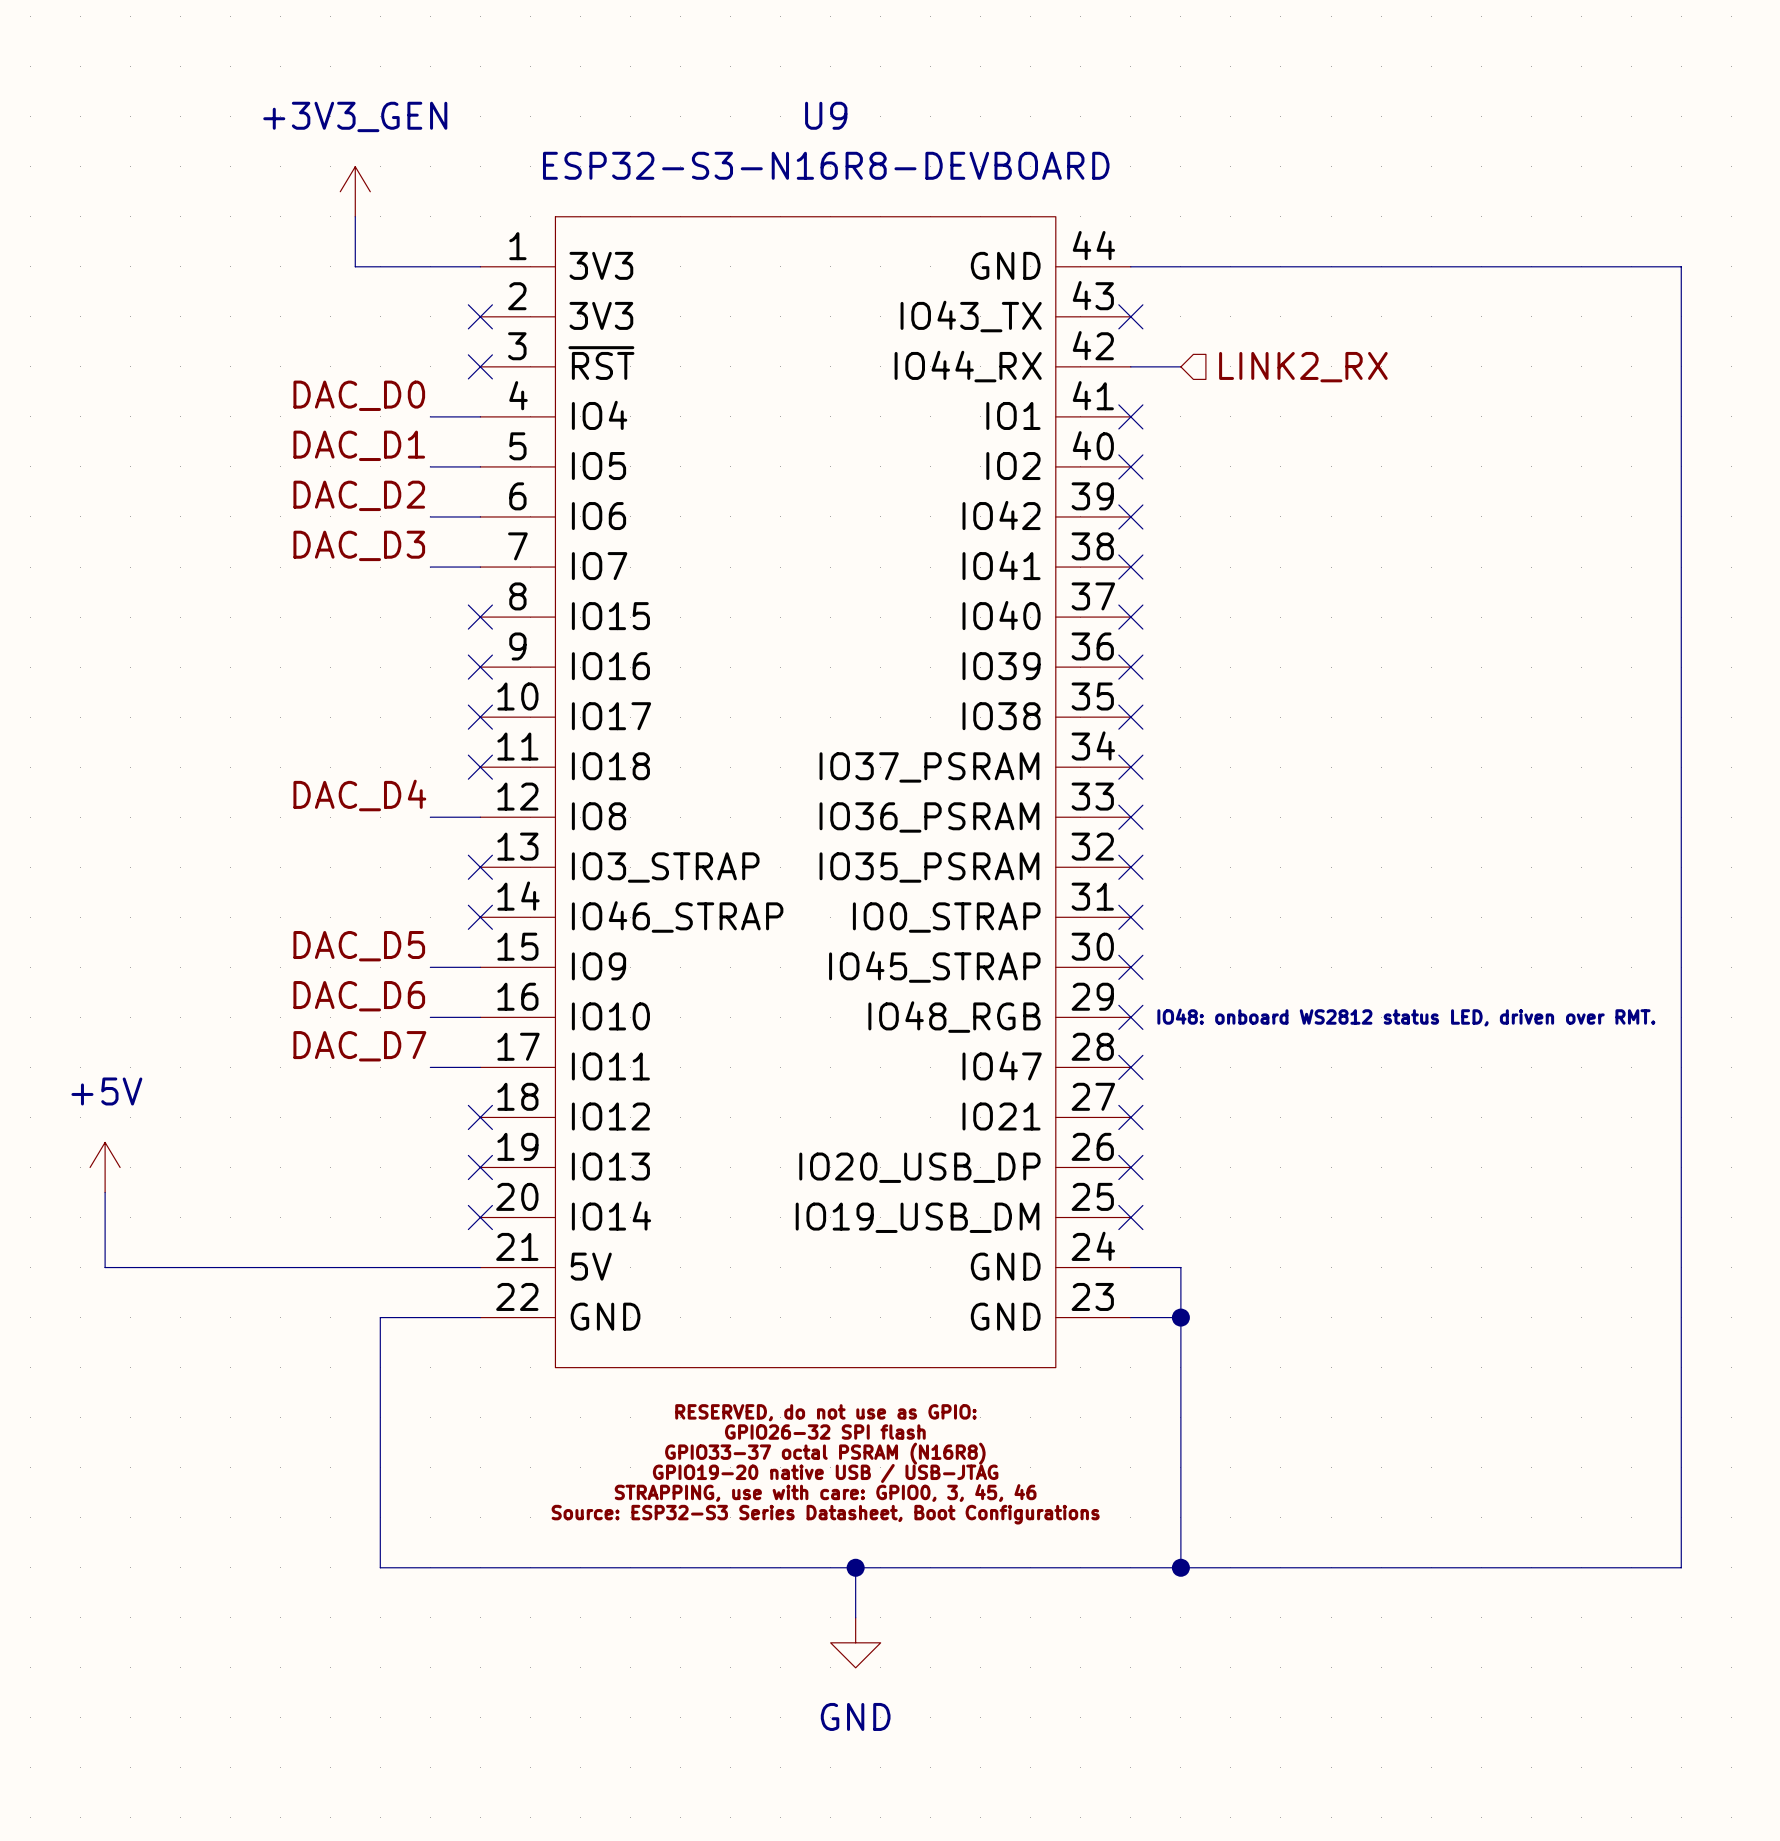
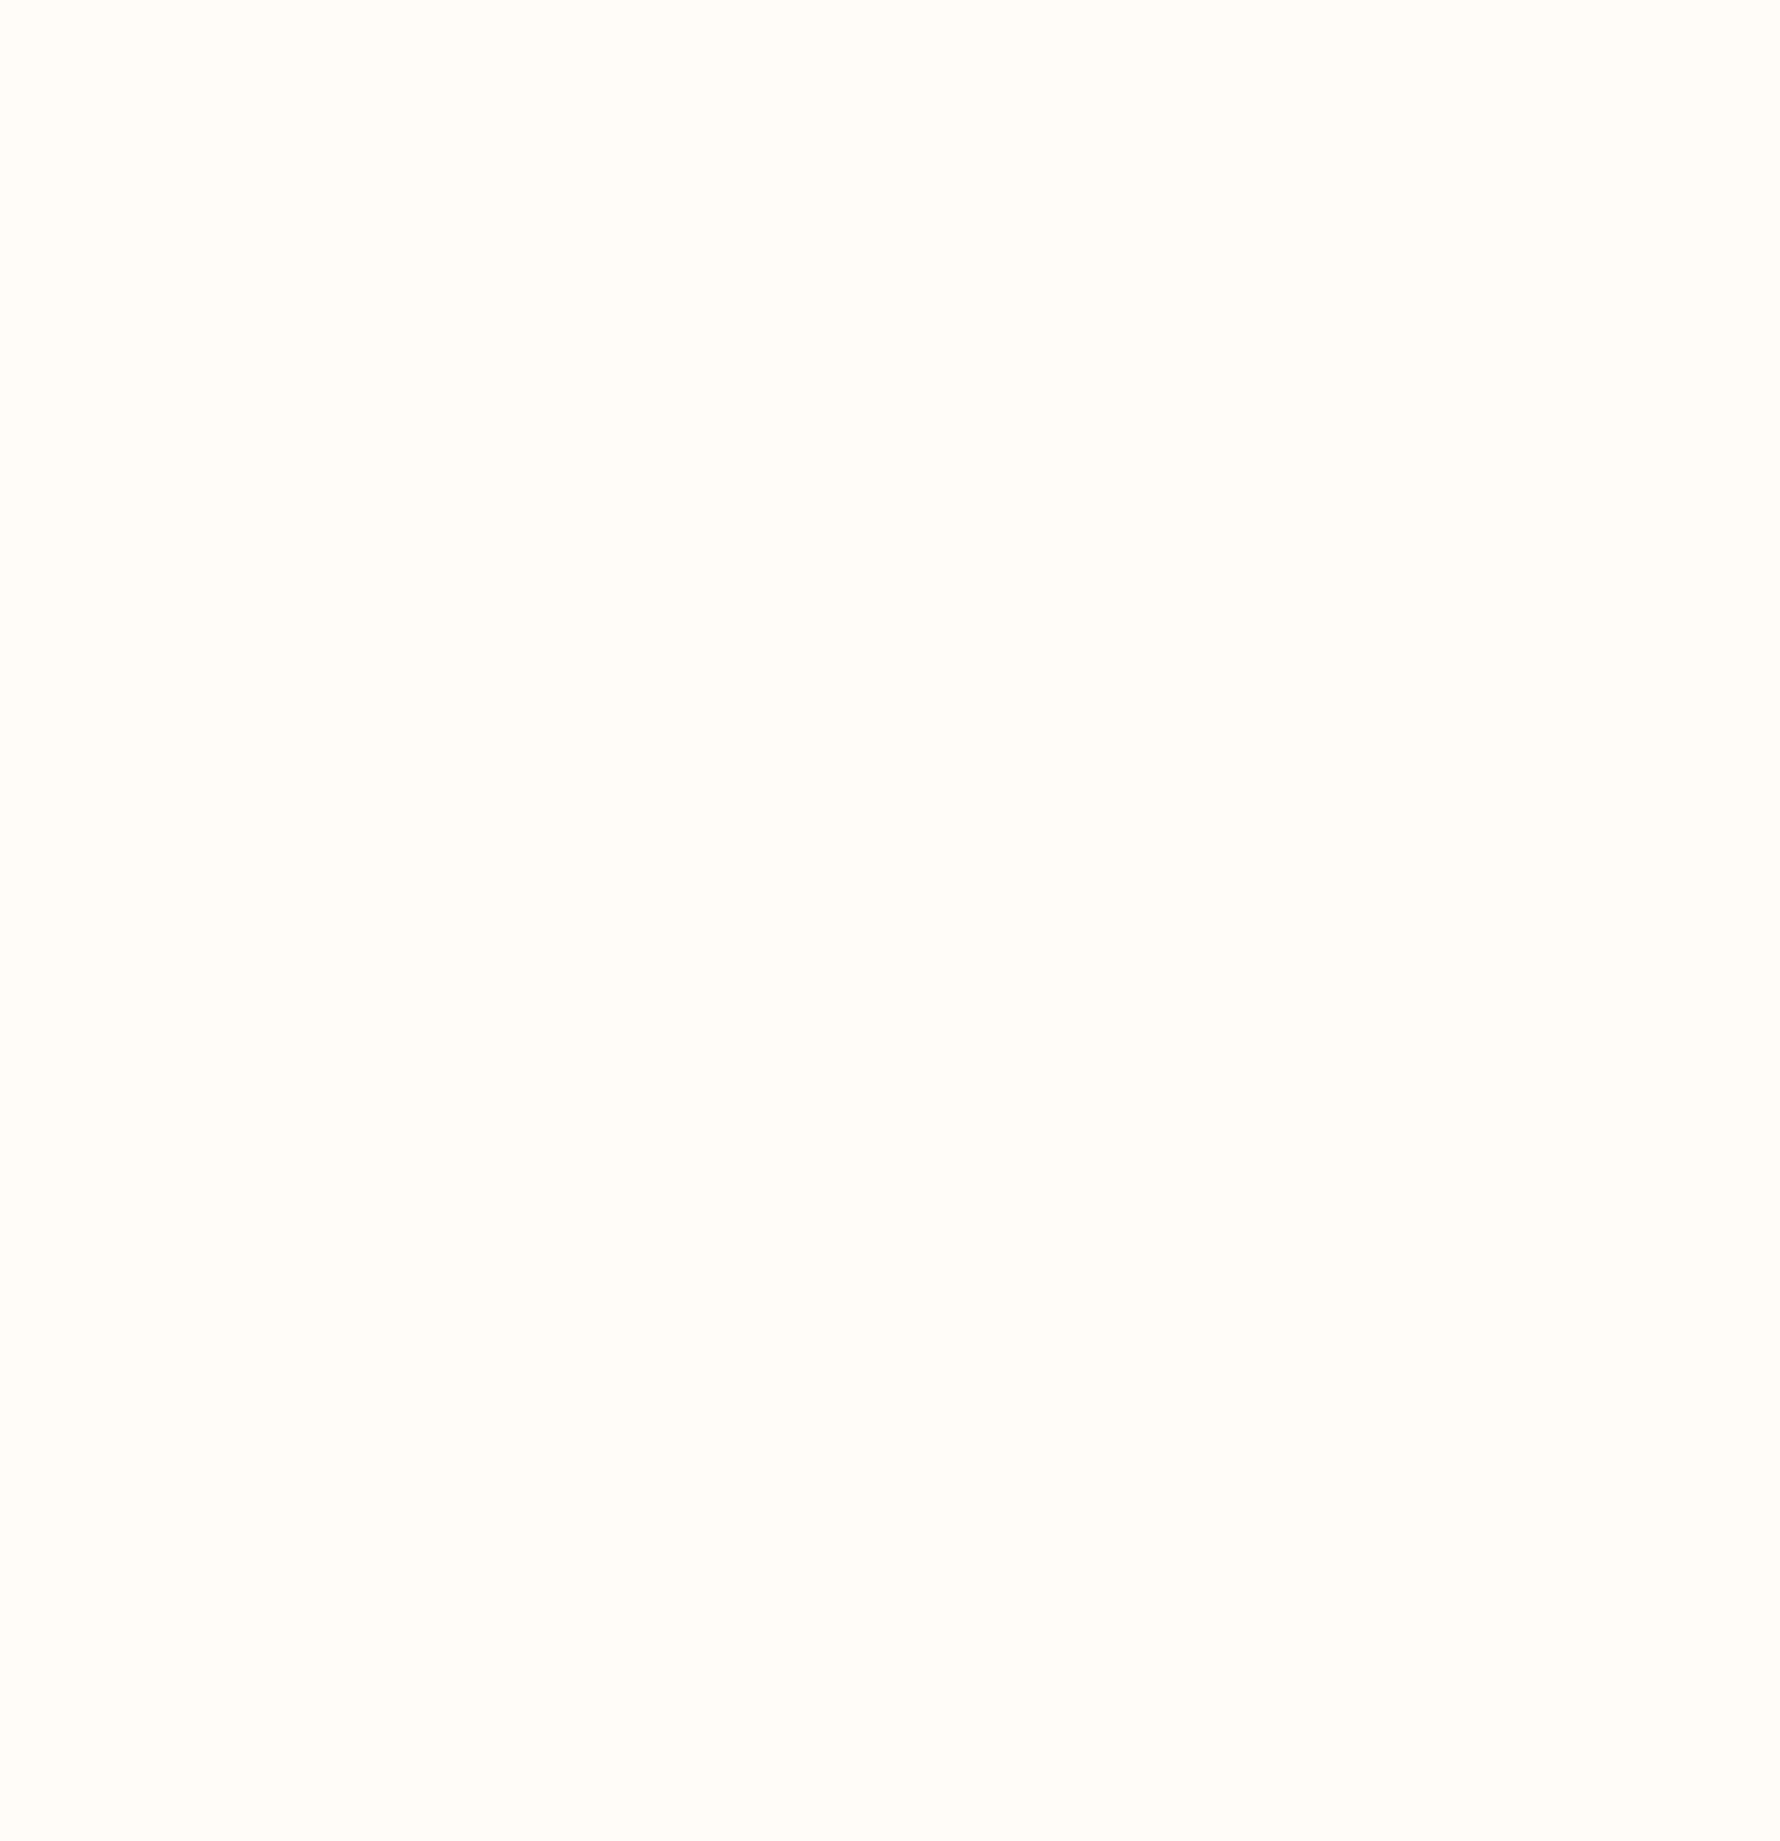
power symbol: +3V3_GEN (355, 191) -> none
wire: (355, 216) (355, 266) (480, 266) -> none
wire: (1130, 266) (1681, 266) (1681, 1567) (380, 1567) (380, 1317) (480, 1317) -> none
no-connect mark: (480, 316) -> none
no-connect mark: (1130, 316) -> none
no-connect mark: (480, 366) -> none
wire: (1130, 366) (1180, 366) -> none
hierarchical label: LINK2_RX (1303, 367) -> none
label: DAC_D0 (359, 395) -> none
wire: (430, 416) (480, 416) -> none
no-connect mark: (1130, 416) -> none
label: DAC_D1 (359, 445) -> none
wire: (430, 466) (480, 466) -> none
no-connect mark: (1130, 466) -> none
label: DAC_D2 (359, 495) -> none
wire: (430, 516) (480, 516) -> none
no-connect mark: (1130, 516) -> none
label: DAC_D3 (359, 545) -> none
wire: (430, 567) (480, 567) -> none
no-connect mark: (1130, 567) -> none
no-connect mark: (480, 617) -> none
no-connect mark: (1130, 617) -> none
no-connect mark: (480, 667) -> none
no-connect mark: (1130, 667) -> none
no-connect mark: (480, 717) -> none
no-connect mark: (1130, 717) -> none
no-connect mark: (480, 767) -> none
no-connect mark: (1130, 767) -> none
U9: ESP32-S3-N16R8-DEVBOARD (805, 792) -> none
label: DAC_D4 (359, 795) -> none
wire: (430, 817) (480, 817) -> none
no-connect mark: (1130, 817) -> none
no-connect mark: (480, 867) -> none
no-connect mark: (1130, 867) -> none
no-connect mark: (480, 917) -> none
no-connect mark: (1130, 917) -> none
label: DAC_D5 (359, 946) -> none
wire: (430, 967) (480, 967) -> none
no-connect mark: (1130, 967) -> none
label: DAC_D6 (359, 996) -> none
wire: (430, 1017) (480, 1017) -> none
no-connect mark: (1130, 1017) -> none
text: IO48: onboard WS2812 status LED, driven over RMT. (1406, 1017) -> none
label: DAC_D7 (359, 1046) -> none
wire: (430, 1067) (480, 1067) -> none
no-connect mark: (1130, 1067) -> none
no-connect mark: (480, 1117) -> none
no-connect mark: (1130, 1117) -> none
power symbol: +5V (105, 1167) -> none
no-connect mark: (480, 1167) -> none
no-connect mark: (1130, 1167) -> none
wire: (105, 1192) (105, 1267) (480, 1267) -> none
no-connect mark: (480, 1217) -> none
no-connect mark: (1130, 1217) -> none
wire: (1130, 1267) (1180, 1267) (1180, 1567) -> none
wire: (1130, 1317) (1180, 1317) -> none
junction: (1180, 1317) -> none
wire: (855, 1567) (855, 1617) -> none
junction: (855, 1567) -> none
junction: (1180, 1567) -> none
power symbol: GND (855, 1642) -> none

